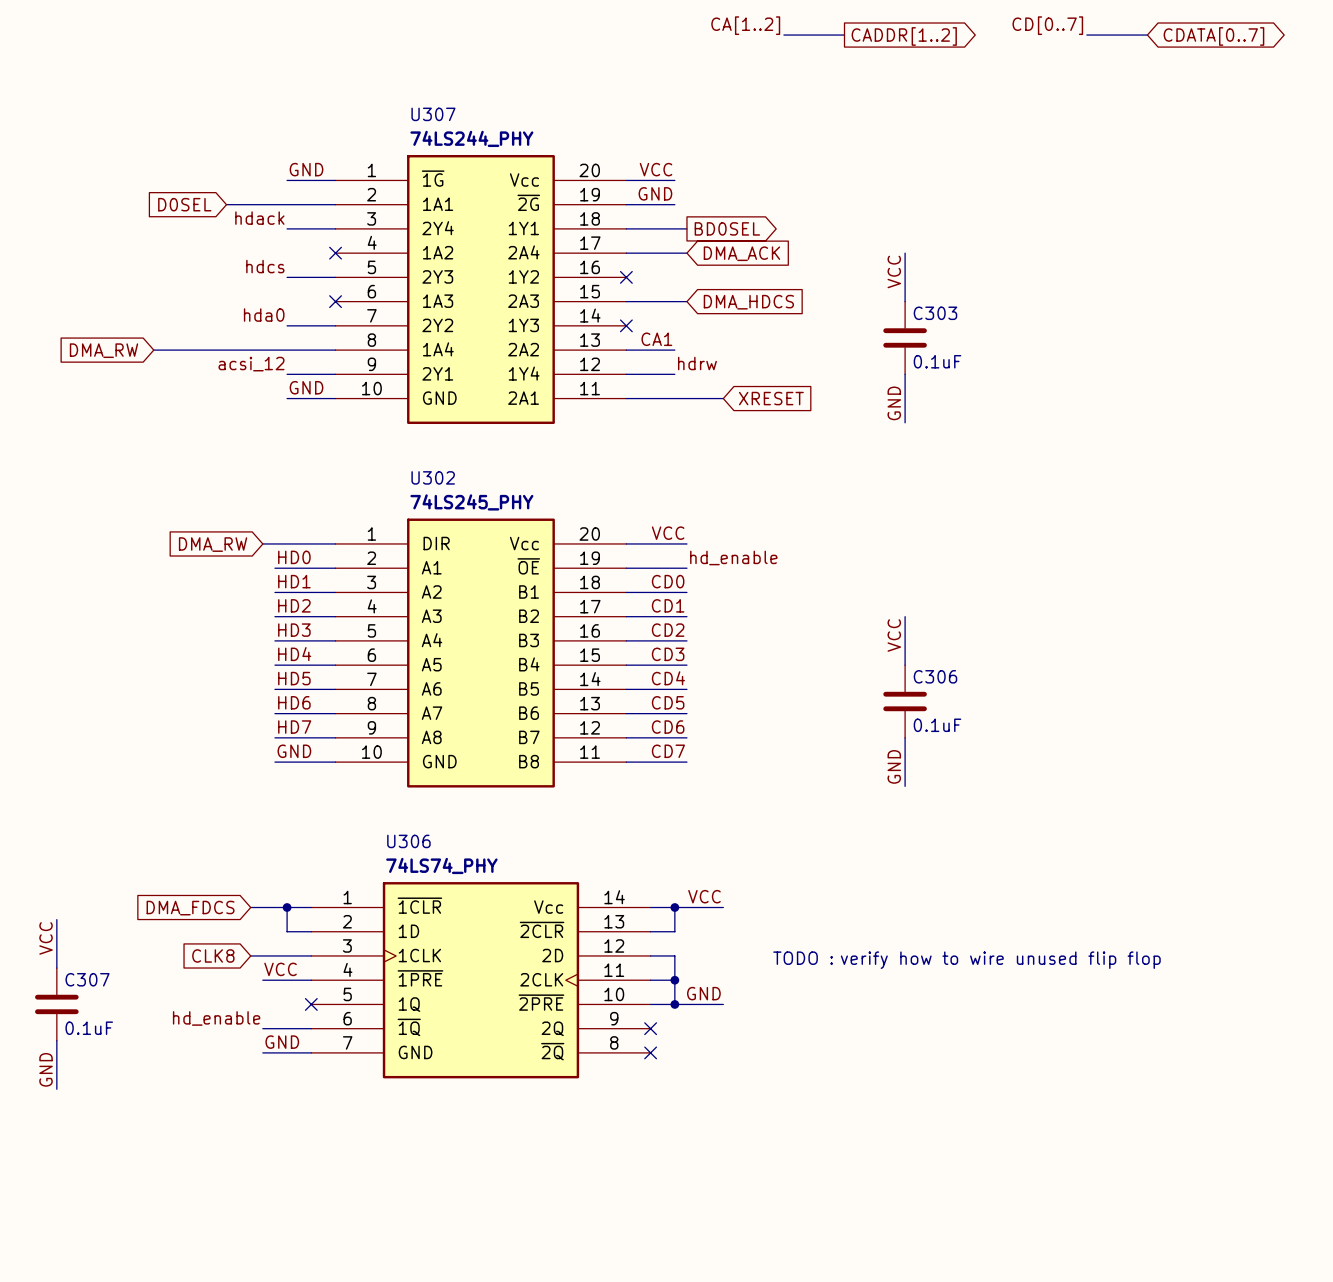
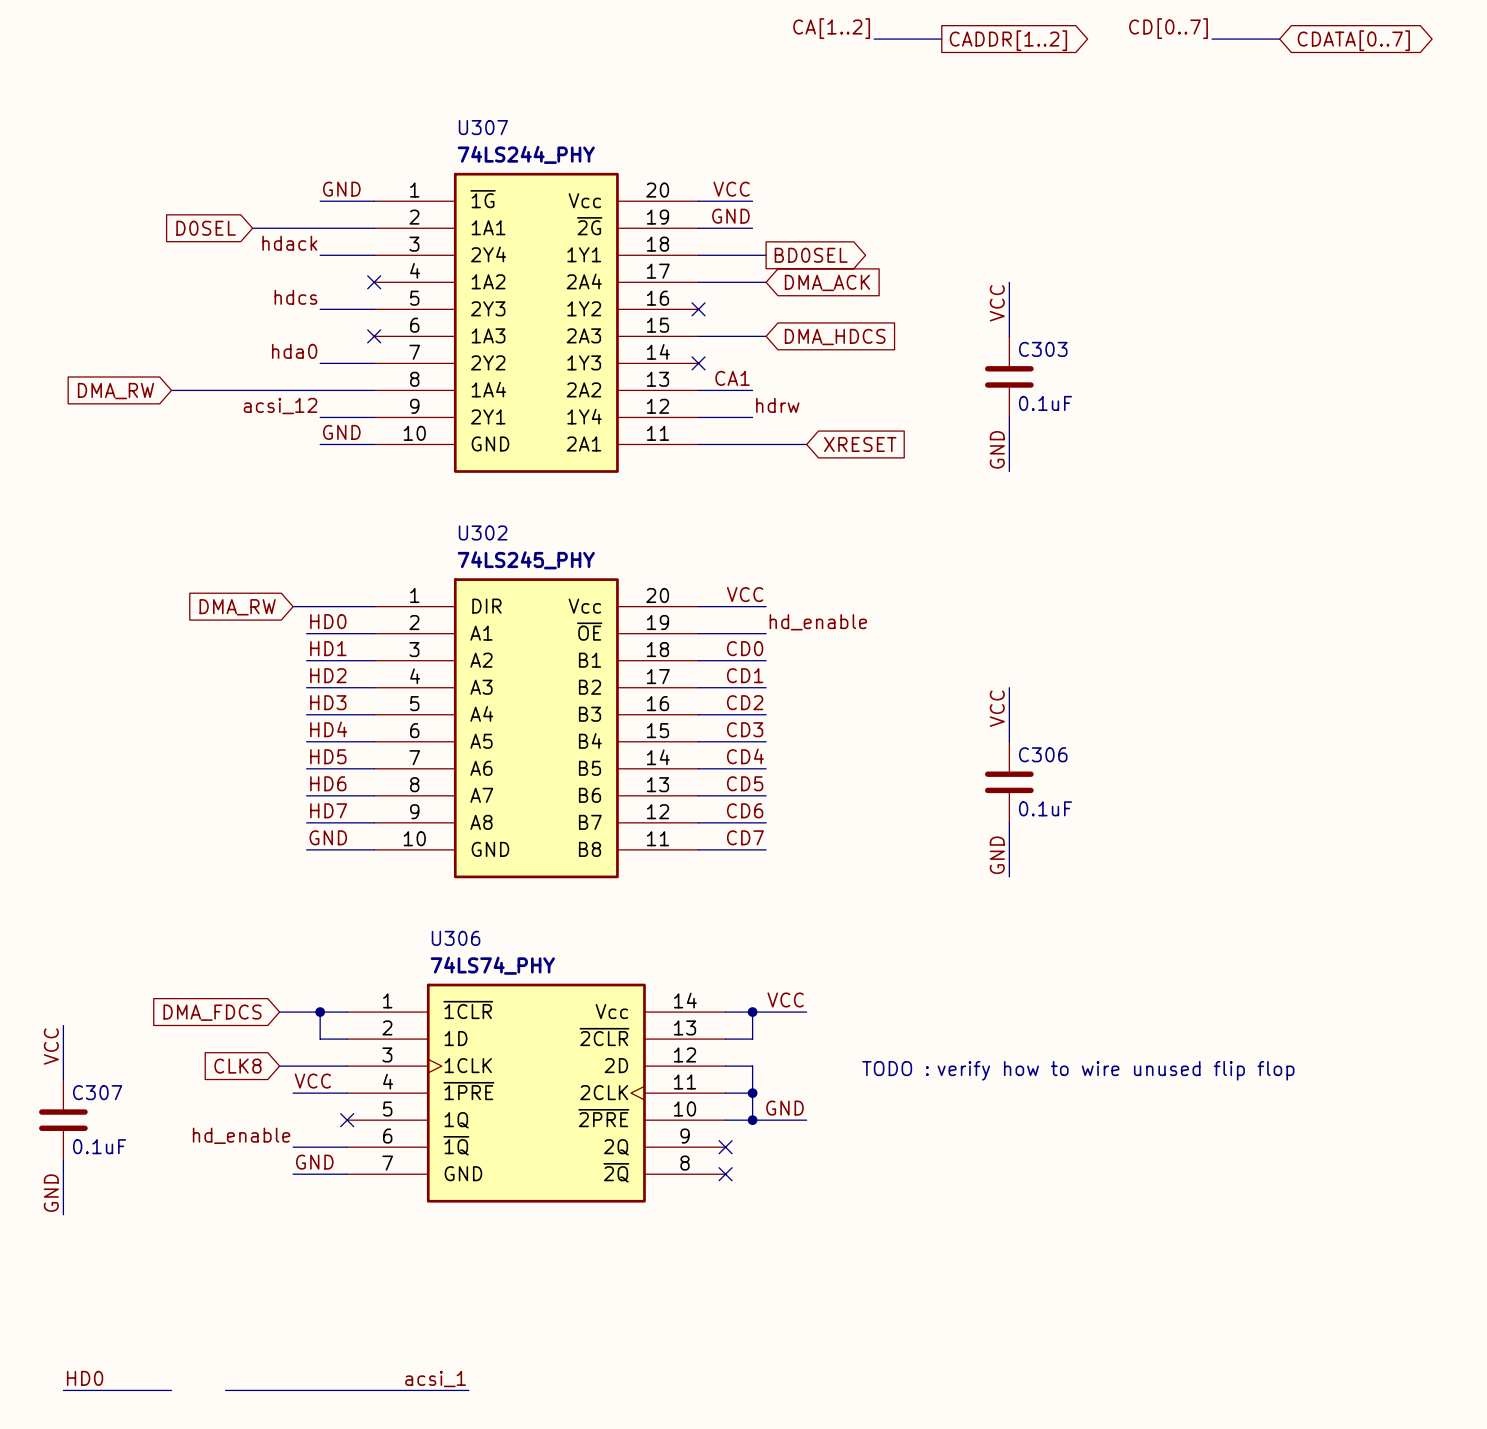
label: none -> HD0 (85, 1378)
label: none -> acsi_1 (435, 1379)
wire: none -> (63, 1390) (171, 1390)
wire: none -> (225, 1390) (468, 1390)

